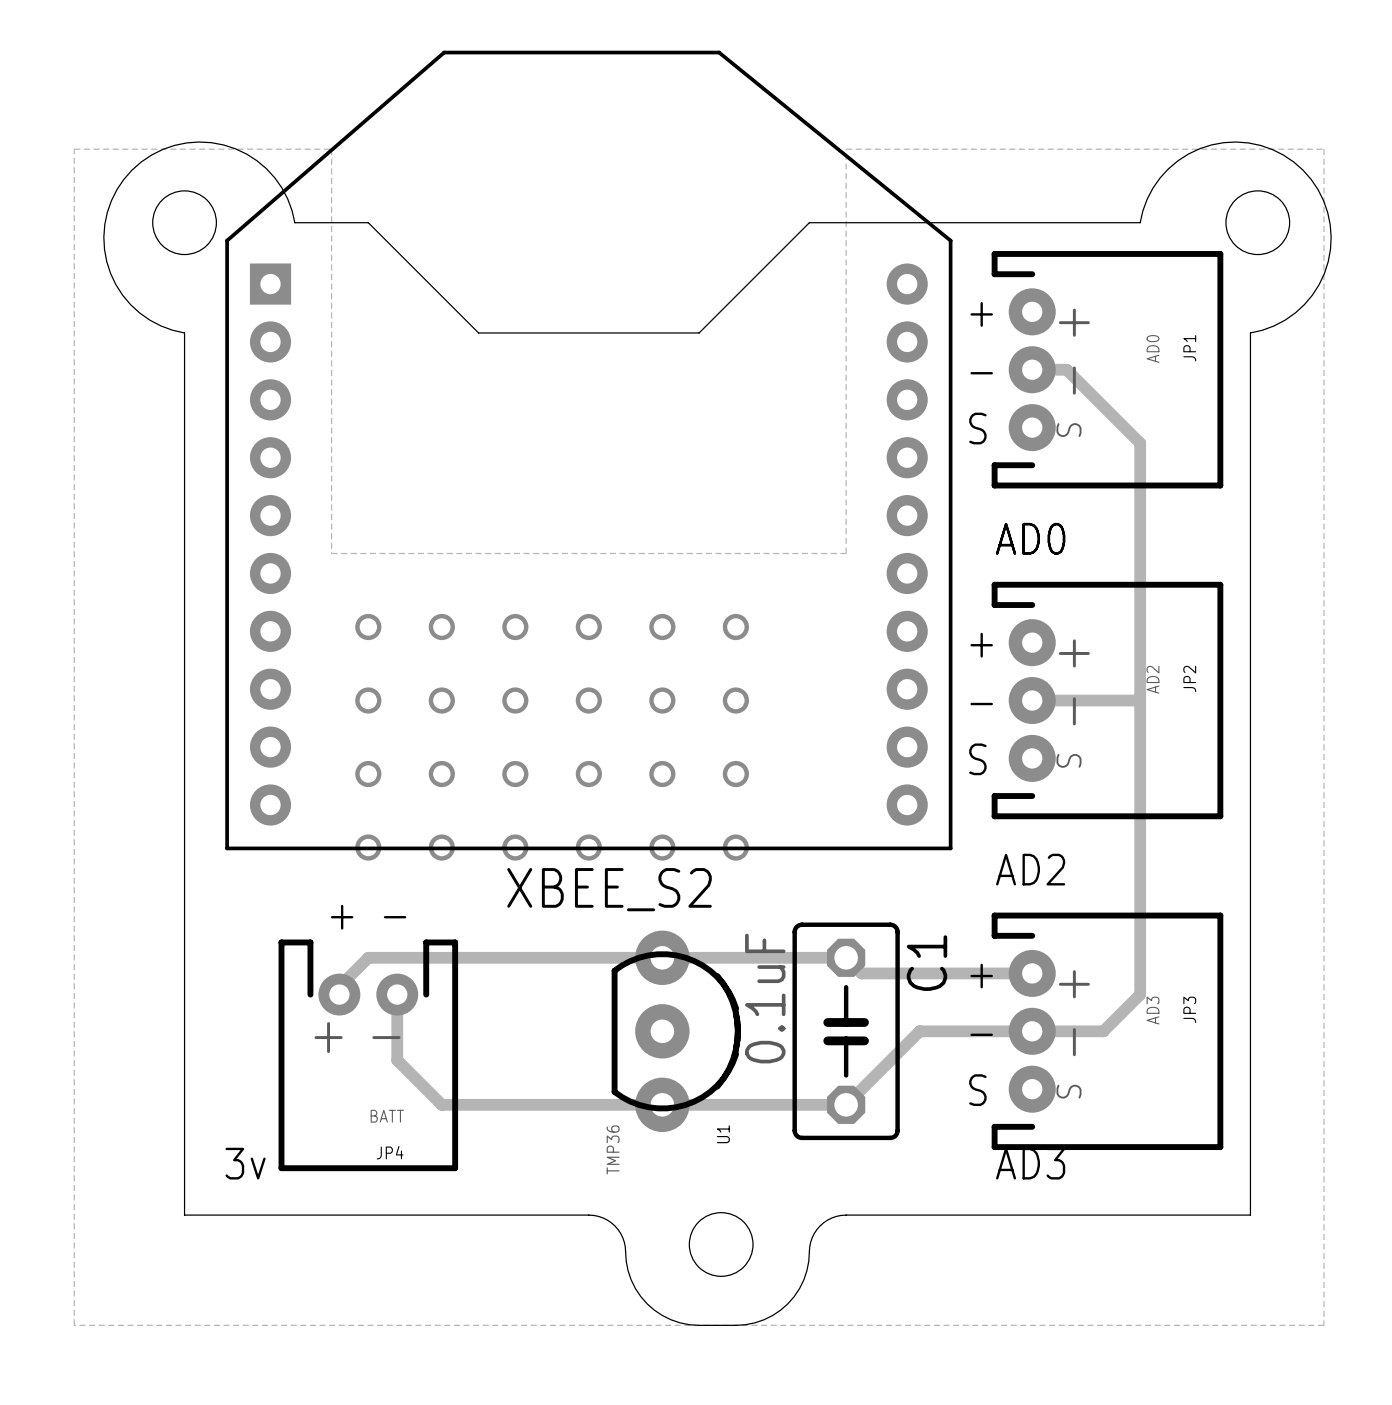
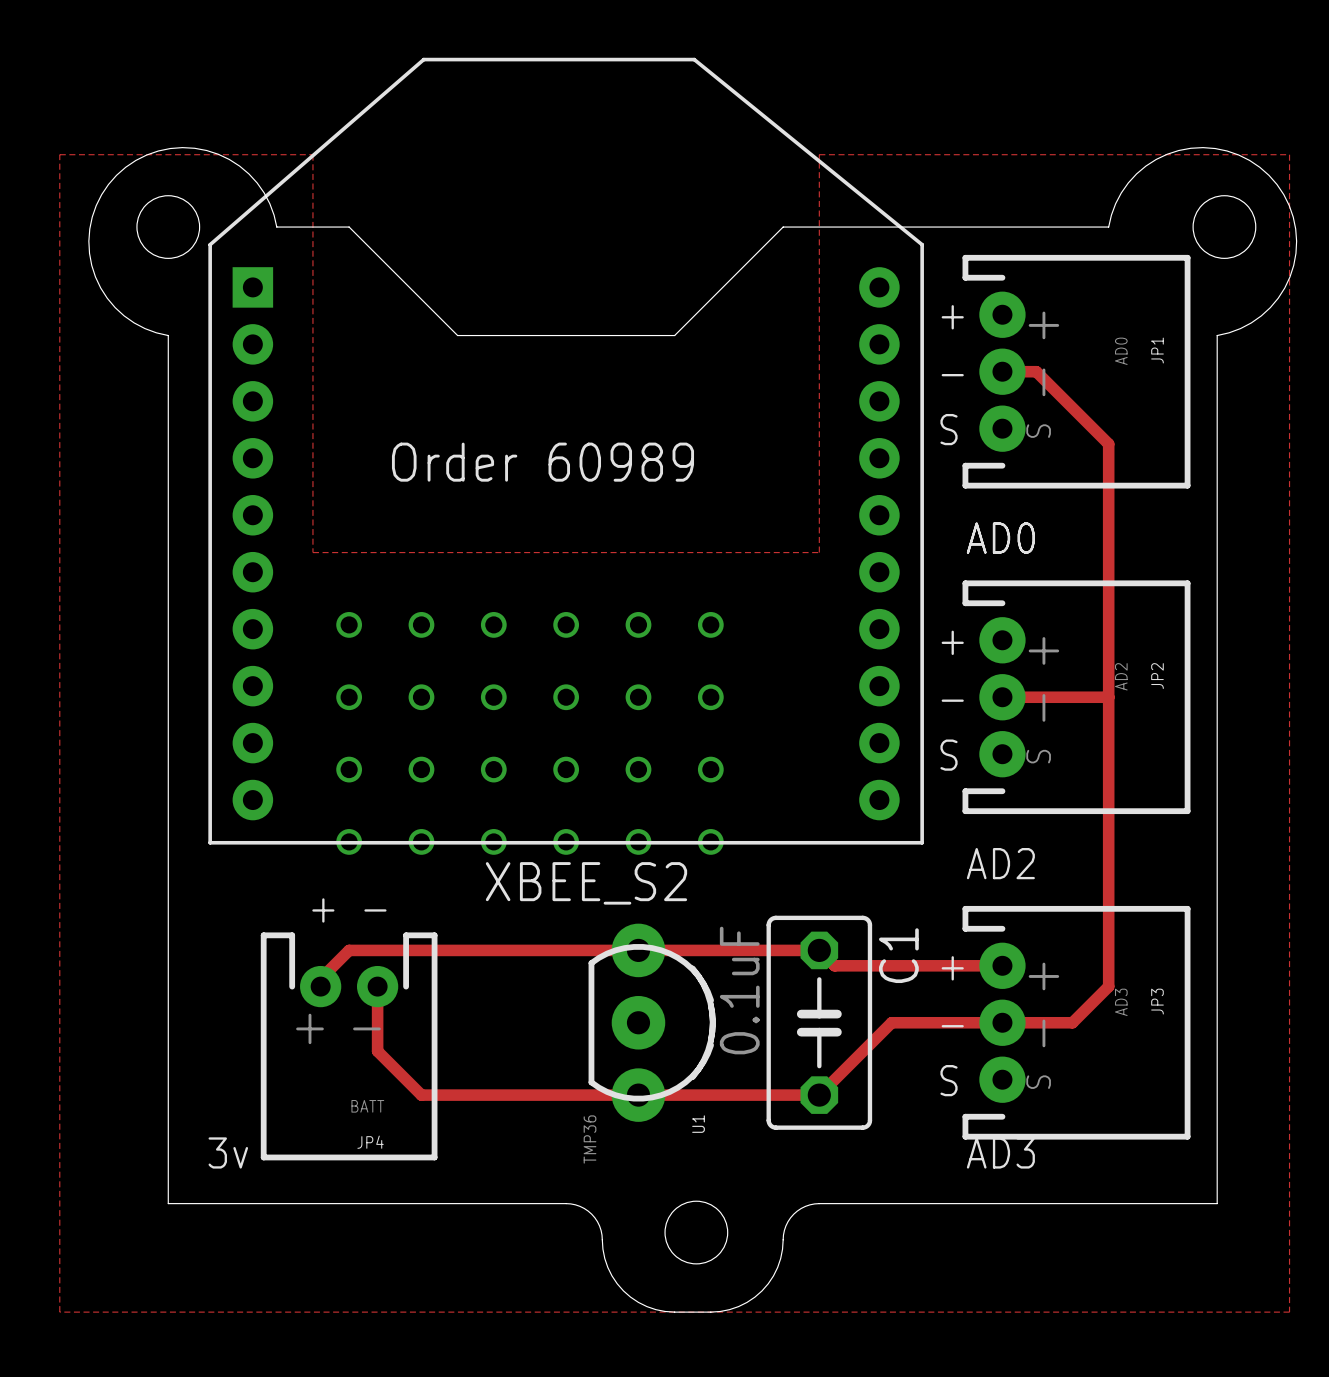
text: none -> Order 60989 (542, 462)

